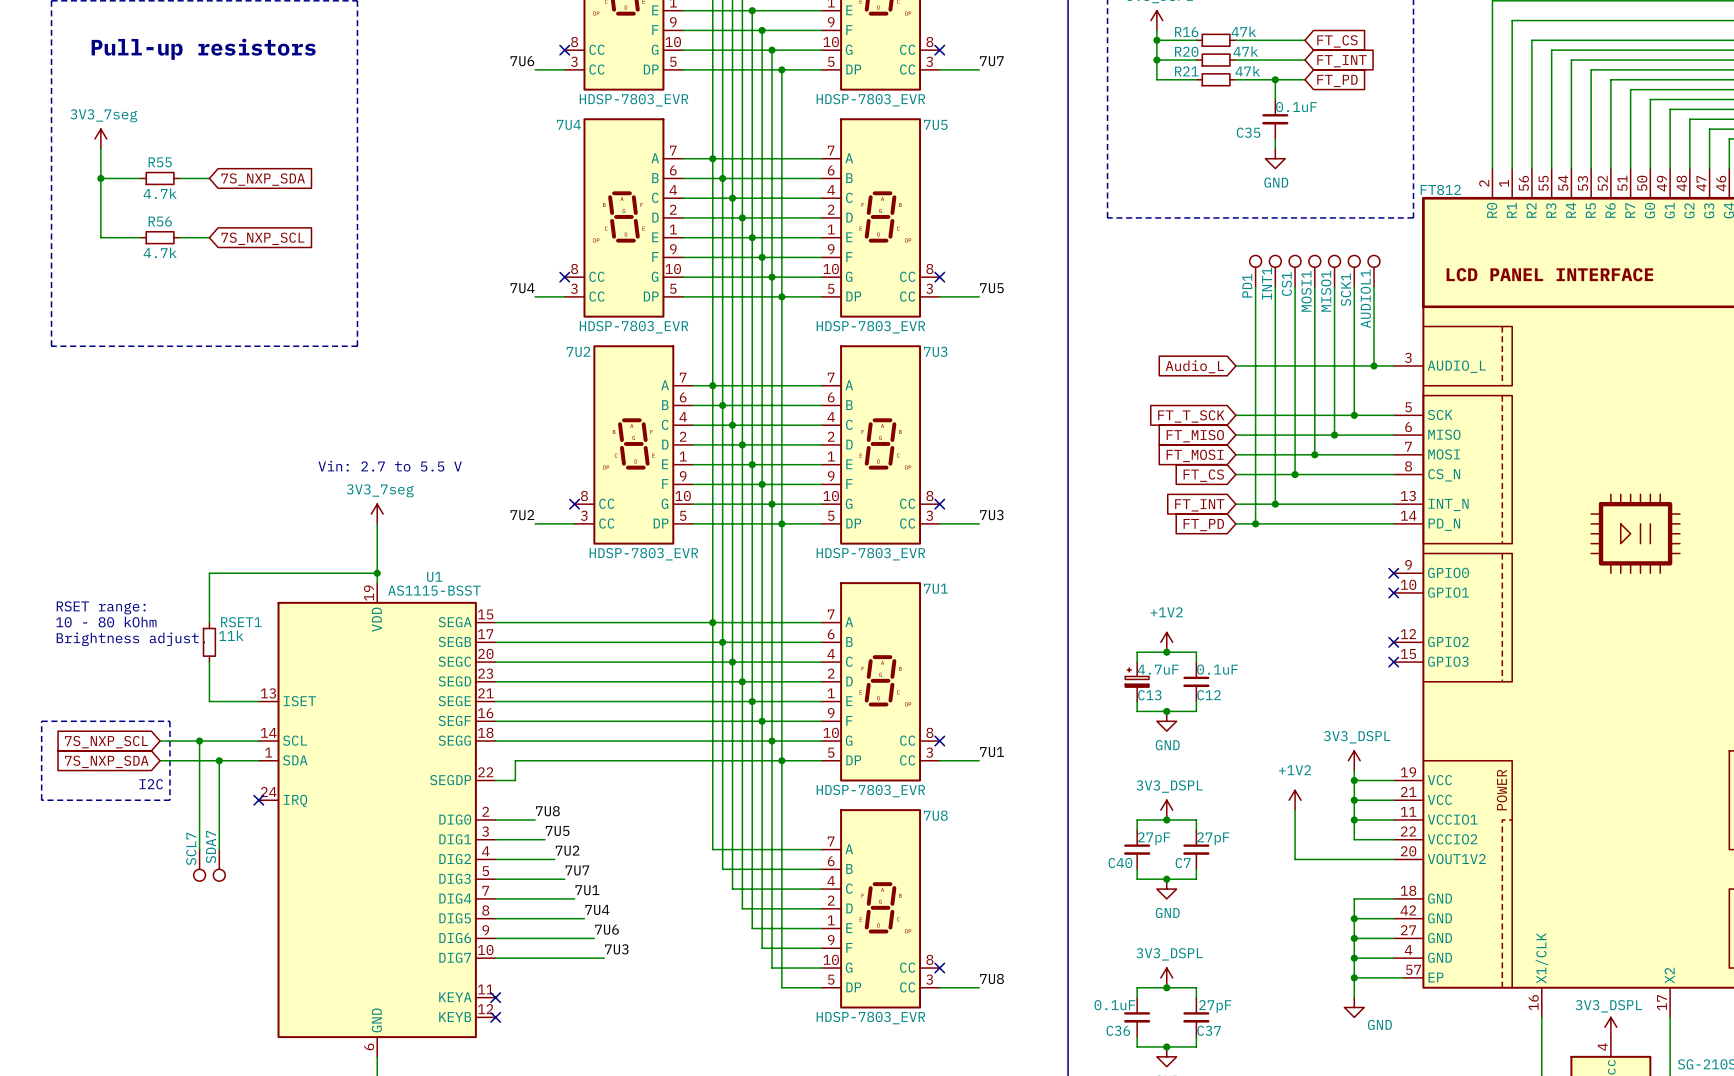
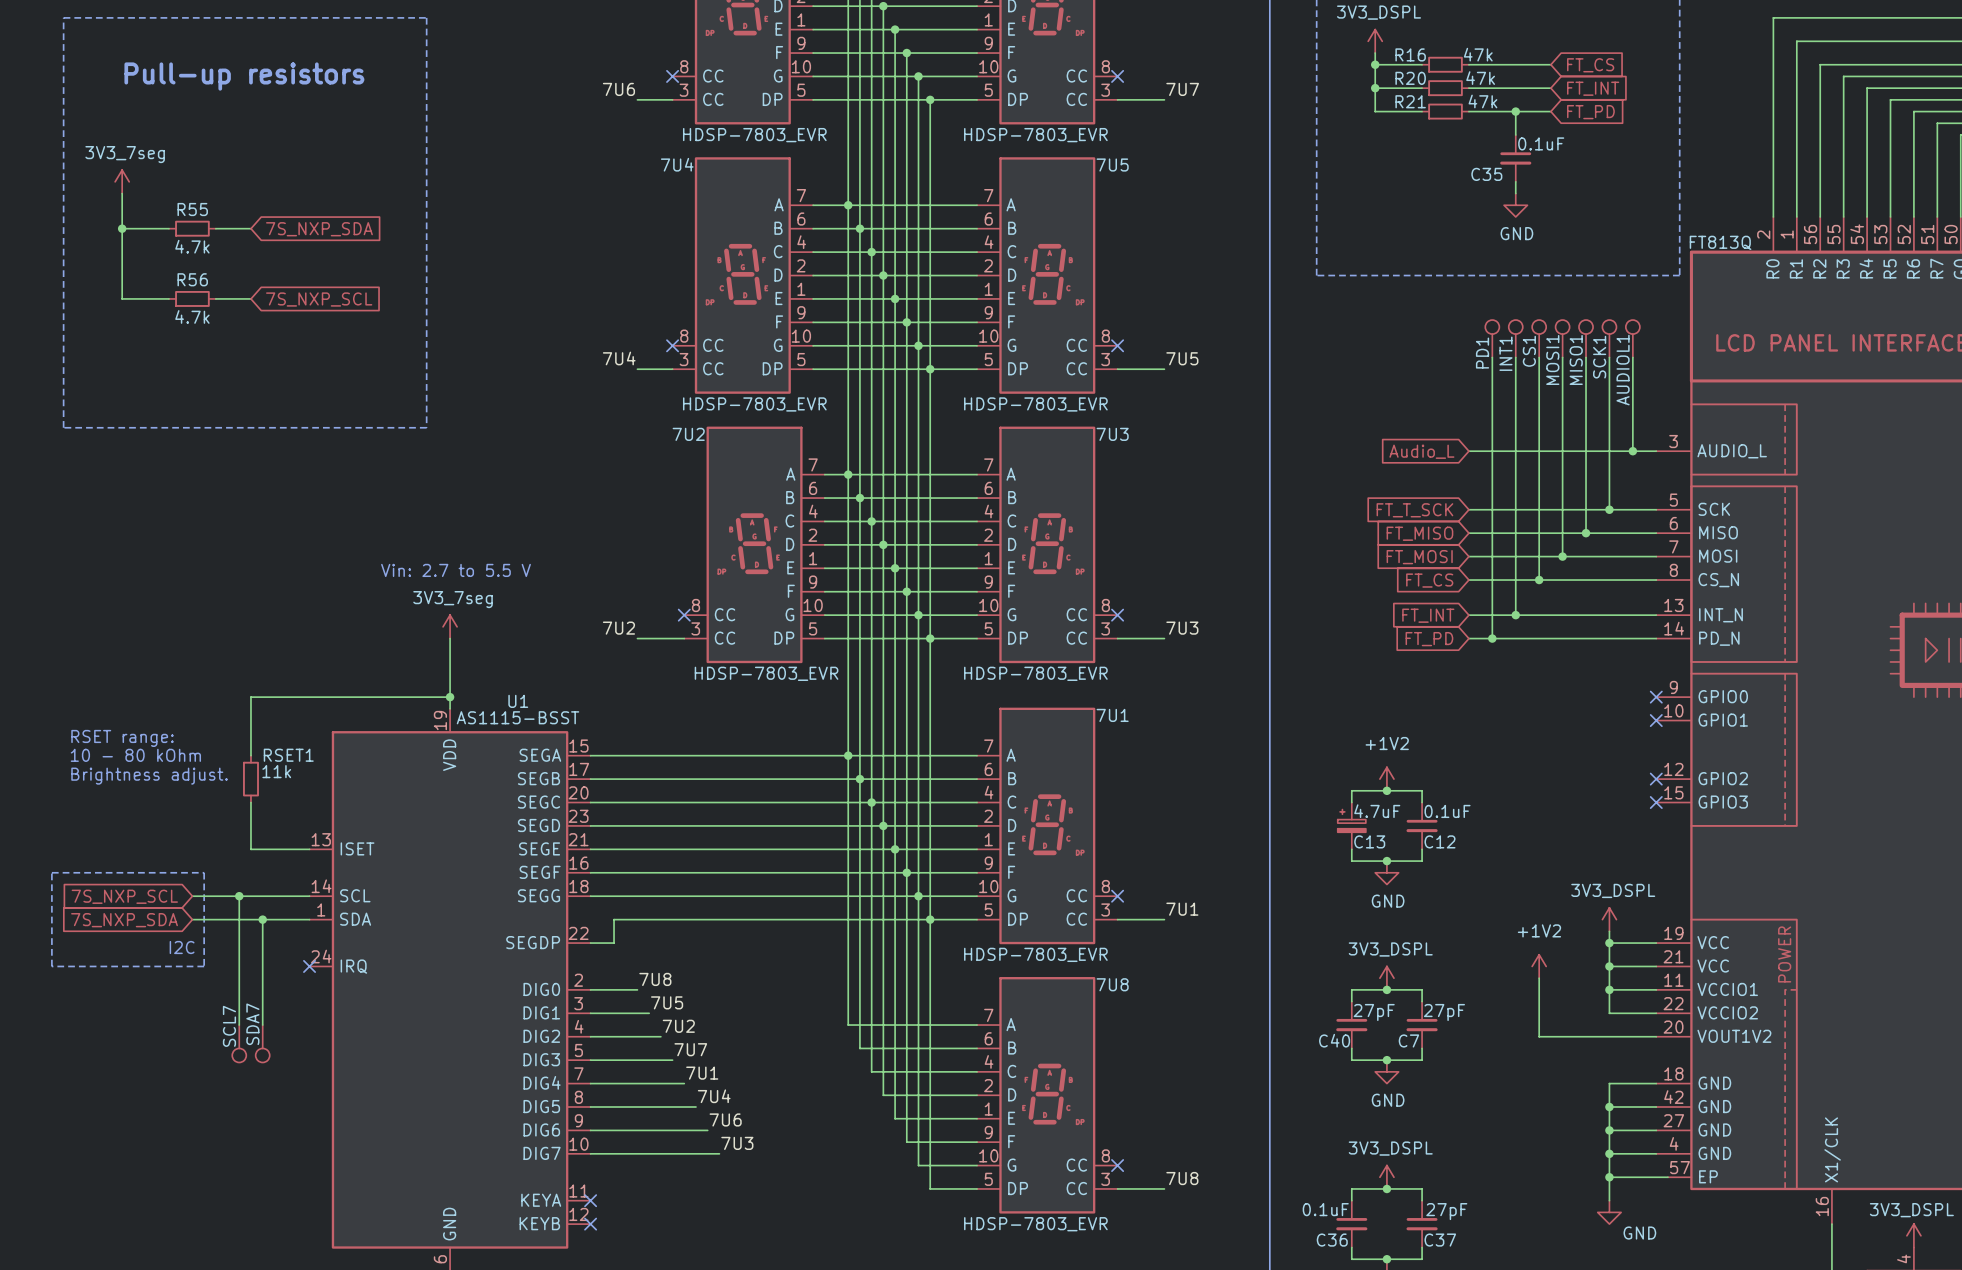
part value: FT812 (1440, 189) -> FT813Q (1720, 242)

